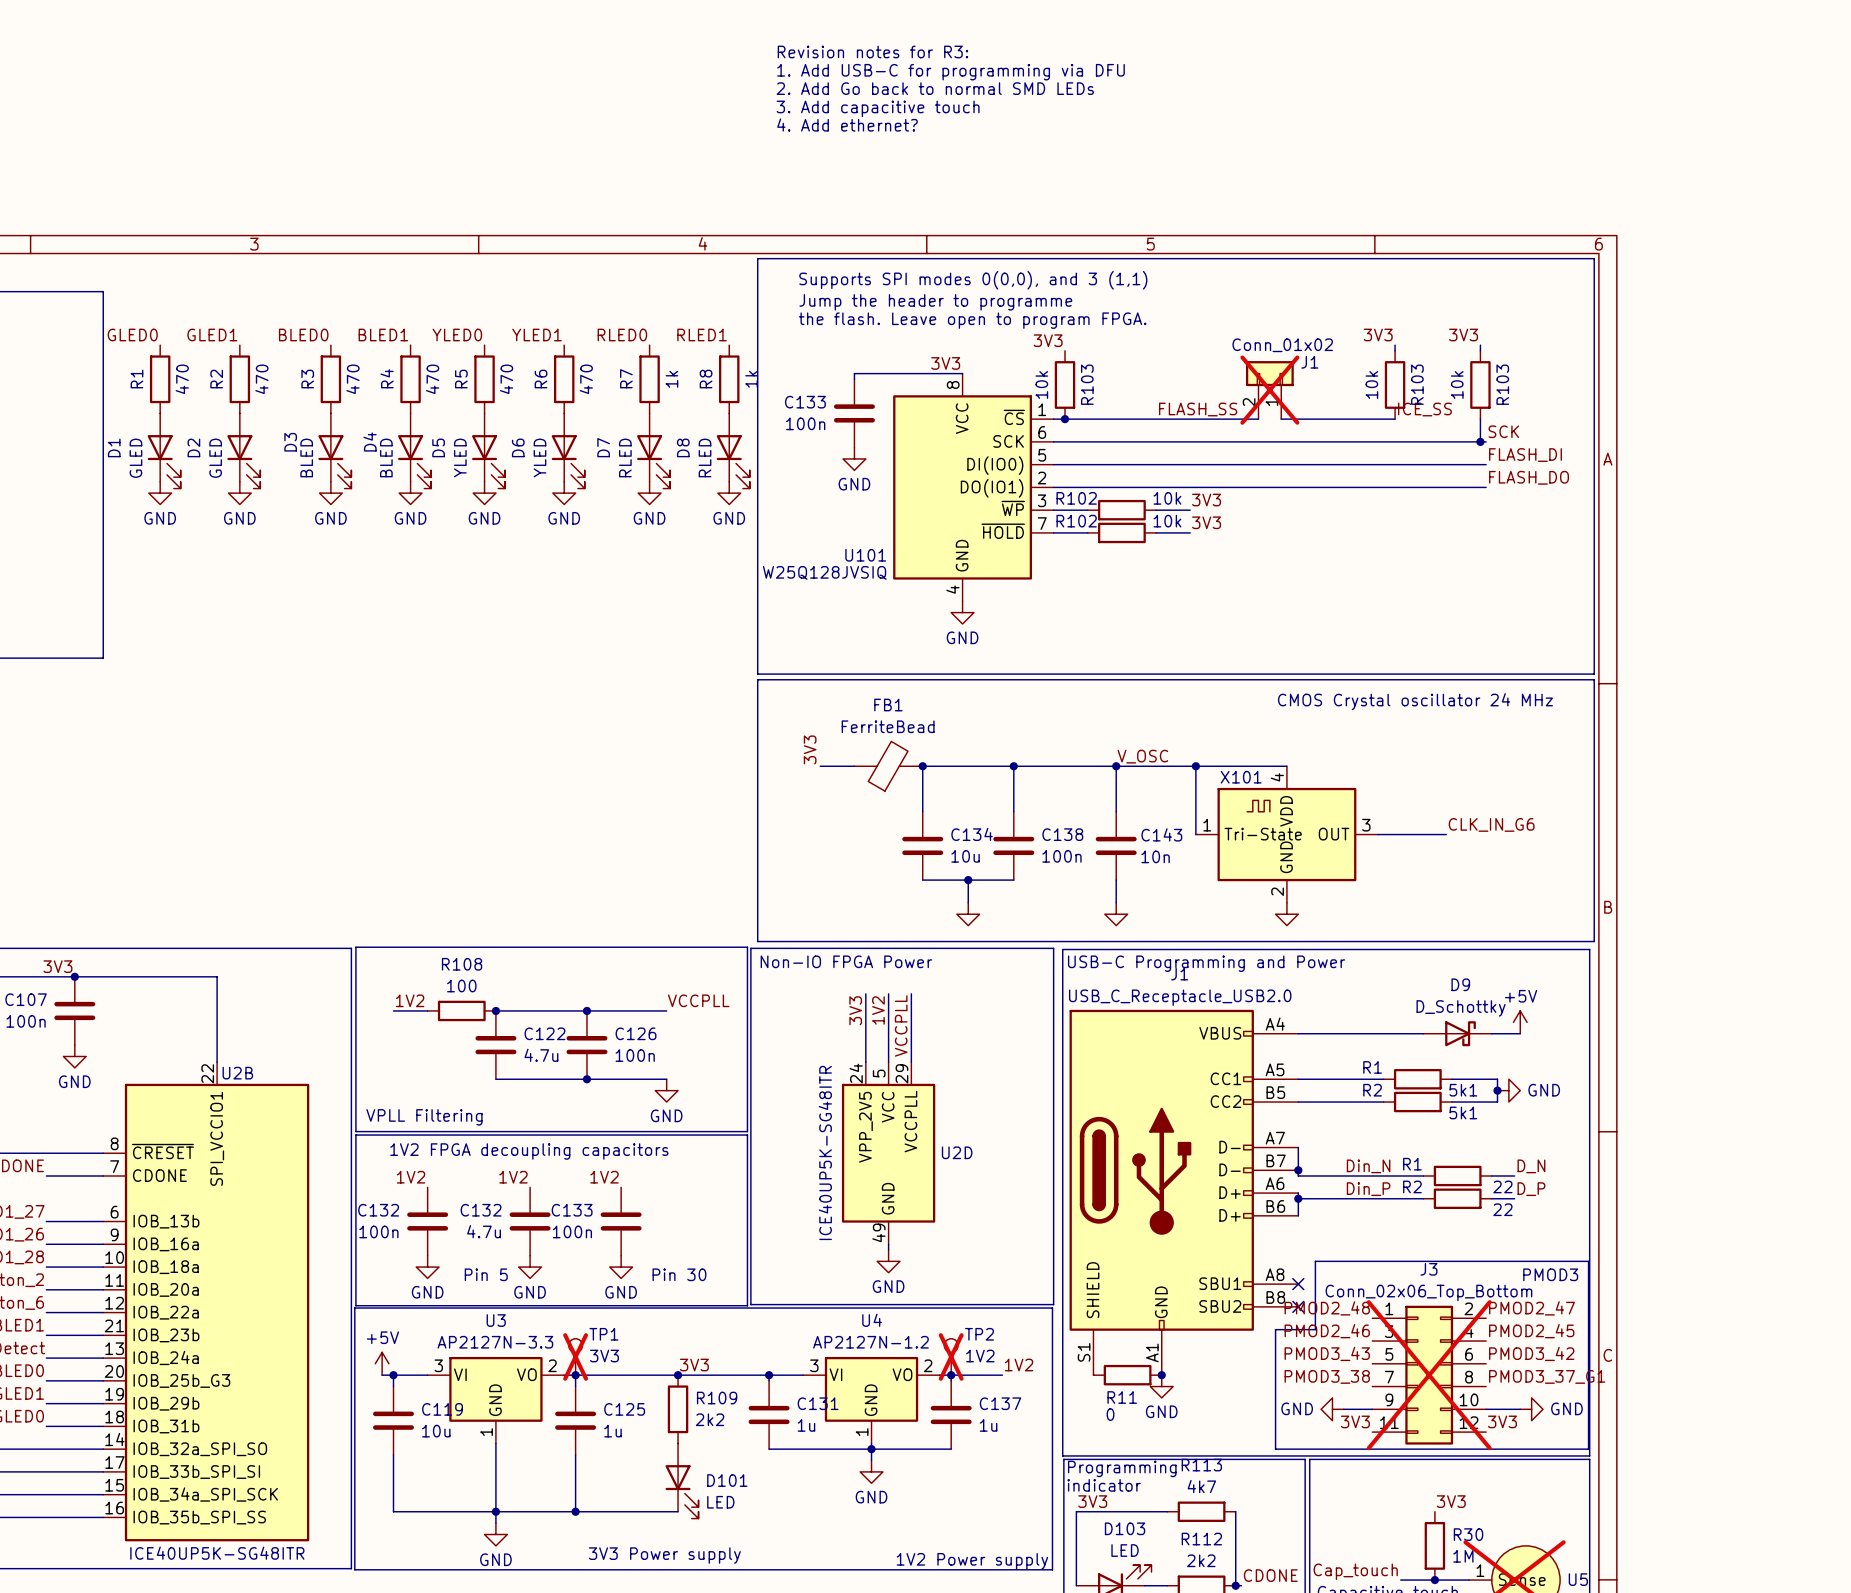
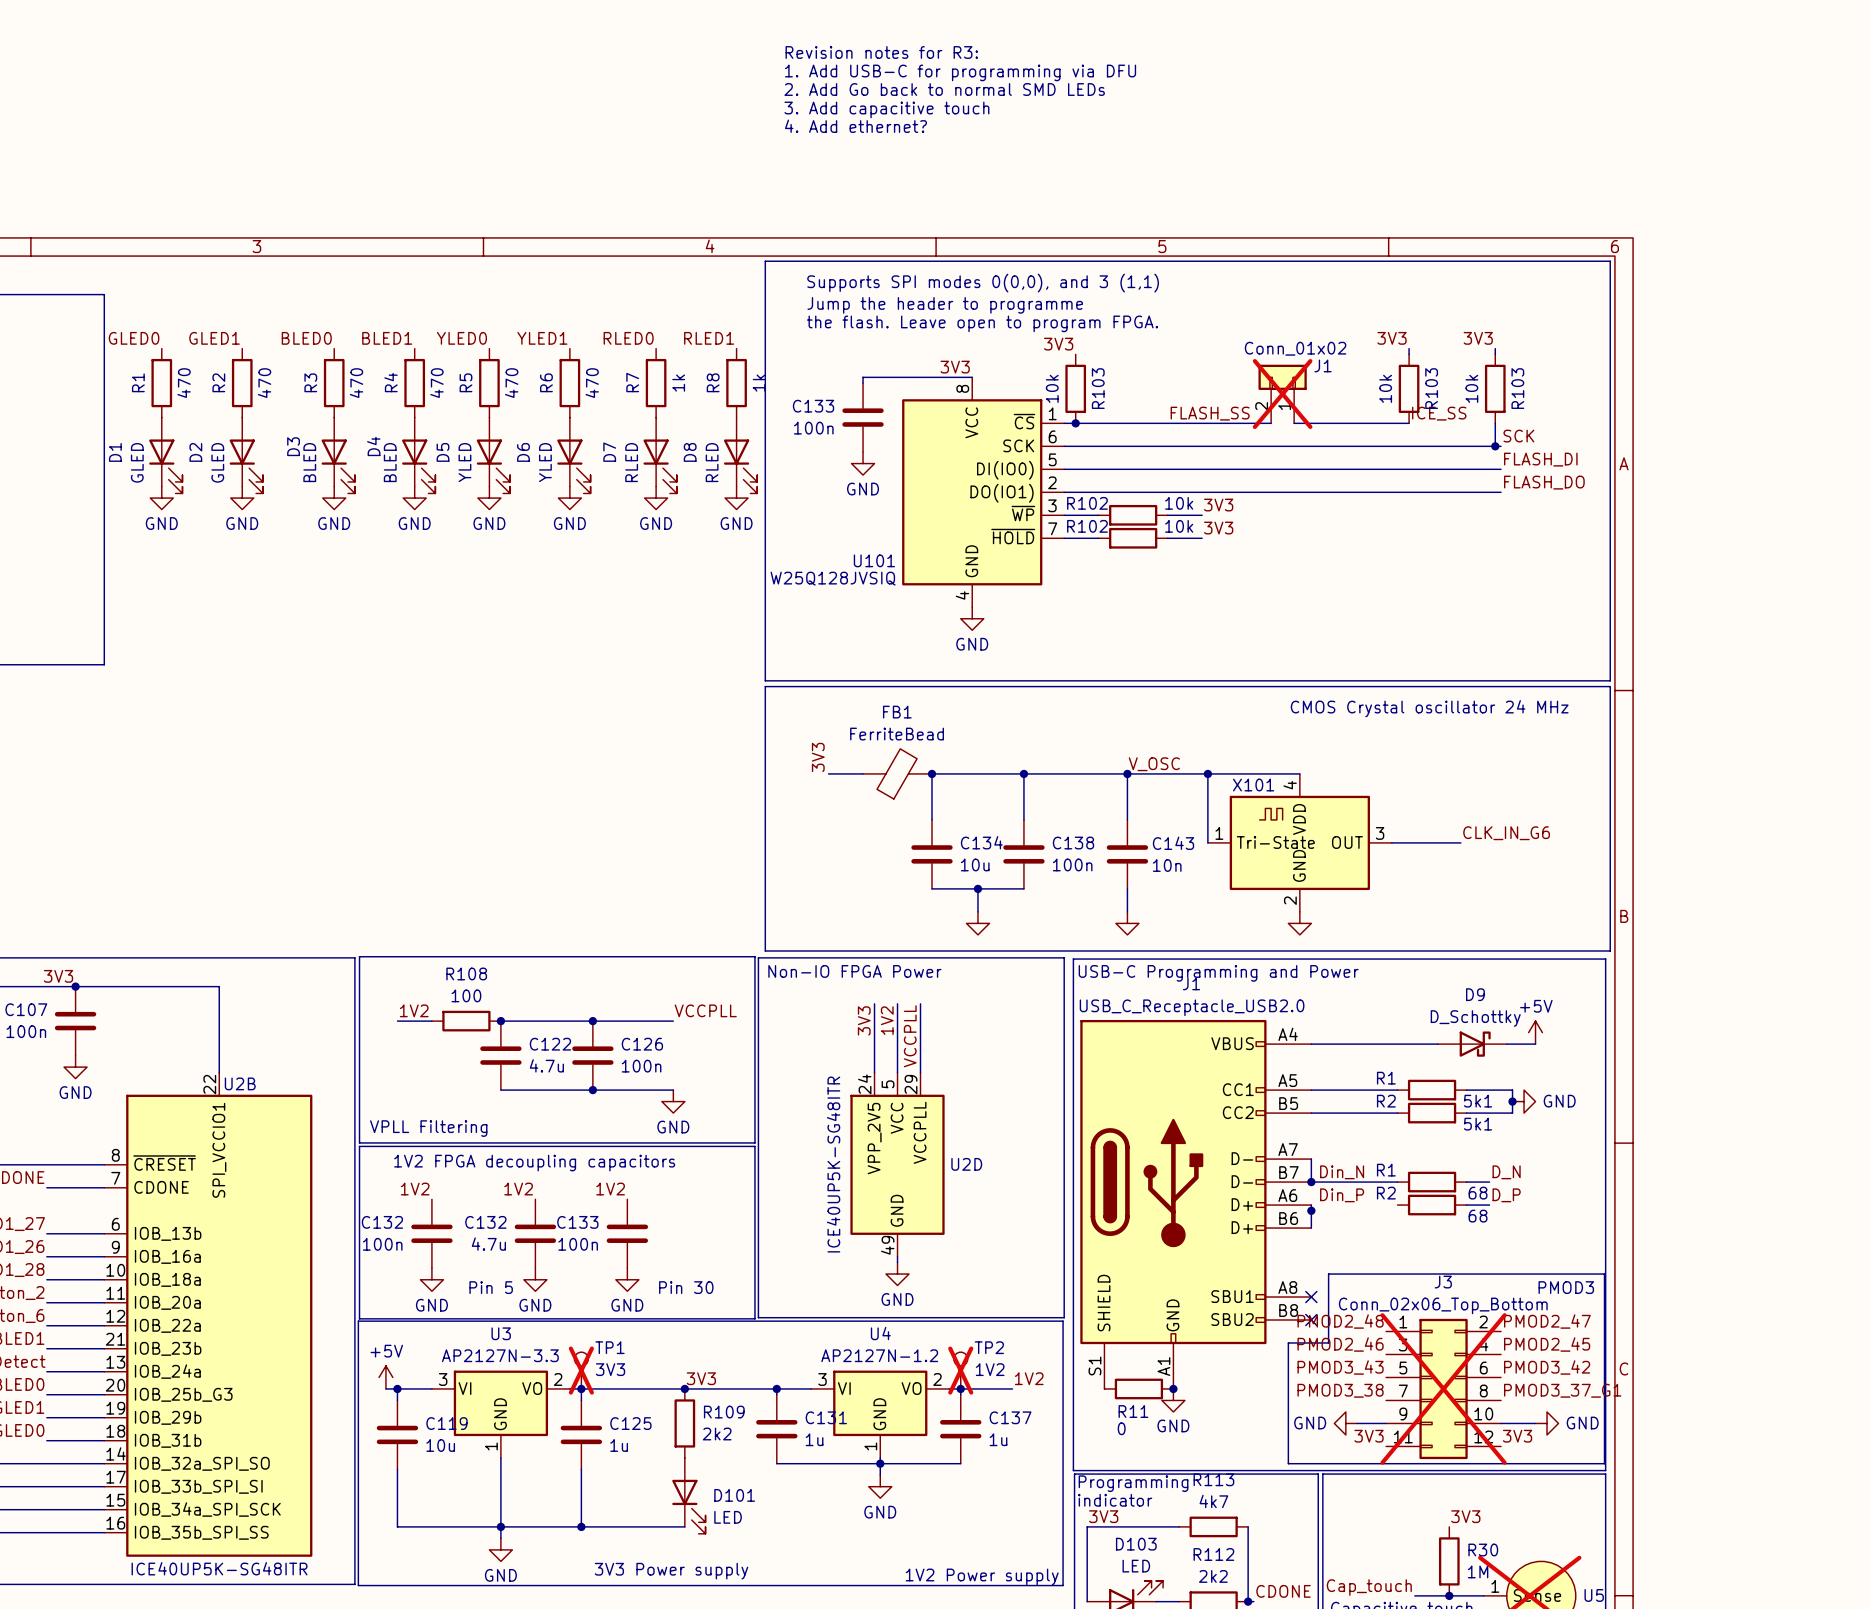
label position: Din_N (1368, 1166) -> Din_N (1342, 1172)
label position: D_N (1531, 1166) -> D_N (1506, 1172)
wire: (1298, 1170) (1298, 1175) (1423, 1175) -> (1311, 1182) (1397, 1182)
R1: none -> 68 (1432, 1182)
R1: 22 (1457, 1175) -> none
wire: (1491, 1175) (1514, 1175) -> (1466, 1182) (1489, 1182)
label position: Din_P (1368, 1189) -> Din_P (1342, 1195)
label position: D_P (1531, 1189) -> D_P (1506, 1195)
R2: none -> 68 (1432, 1205)
wire: (1298, 1198) (1423, 1198) -> none
R2: 22 (1457, 1198) -> none
wire: (1491, 1198) (1514, 1198) -> (1466, 1205) (1489, 1205)

